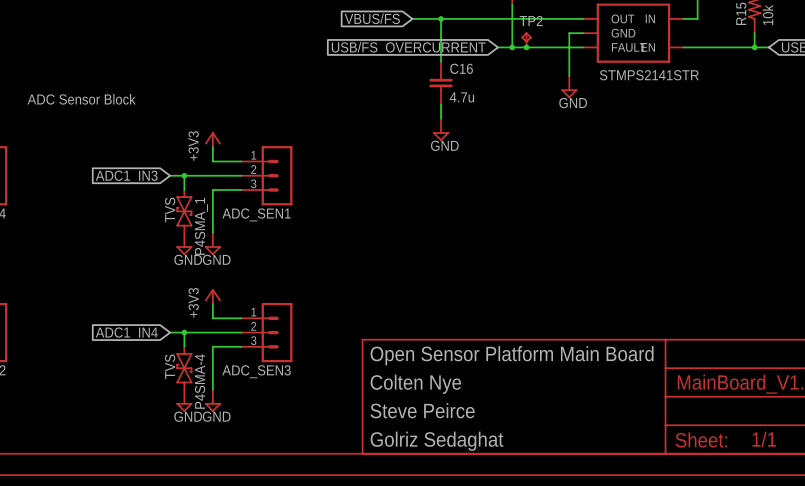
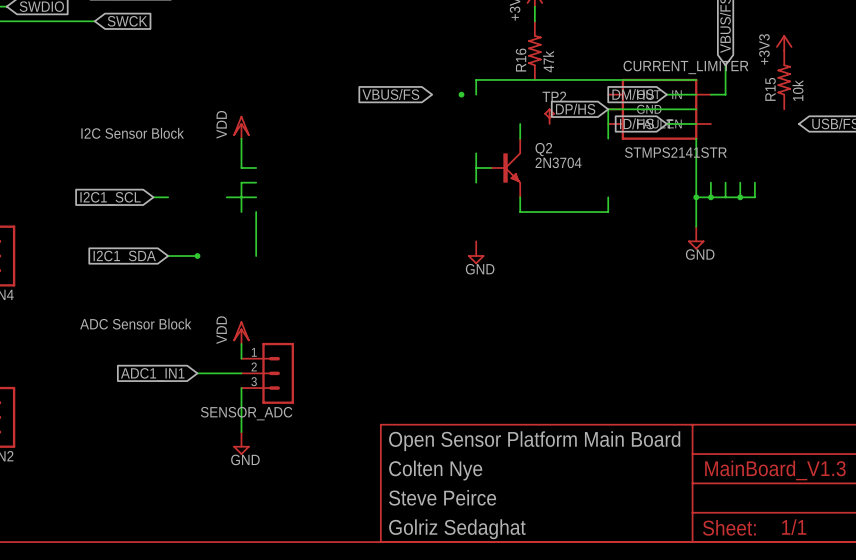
wire: (512, 4) (512, 47) -> none
wire: none -> (696, 79) (476, 79) (476, 94)
wire: (412, 18) (583, 18) -> none
wire: (441, 18) (441, 61) -> none
global label: none -> DM/HS (633, 94)
wire: none -> (666, 94) (696, 94)
global label: none -> DP/HS (575, 109)
wire: (583, 33) (569, 33) (569, 75) -> none
wire: none -> (696, 109) (608, 109) (608, 138)
wire: (754, 33) (754, 47) -> (740, 182) (740, 197)
wire: (498, 47) (583, 47) -> (520, 123) (520, 138)
junction: (512, 47) -> none
junction: (526, 47) -> none
global label: none -> ID/HS (636, 123)
wire: none -> (666, 123) (696, 123)
wire: (683, 47) (768, 47) -> none
junction: (754, 47) -> none
global label: USB/FS_OVERCURRENT (408, 48) -> none
power symbol: none -> VDD (241, 127)
text: none -> I2C Sensor Block (132, 133)
wire: none -> (241, 138) (241, 168) (256, 168)
wire: none -> (696, 138) (696, 226)
wire: none -> (476, 153) (476, 182)
C16: 4.7u (441, 83) -> none
power symbol: GND (569, 87) -> none
wire: none -> (476, 168) (490, 168)
Q2: none -> 2N3704 (505, 168)
text: ADC Sensor Block (81, 99) -> none
wire: none -> (256, 182) (241, 182) (241, 212)
wire: (441, 104) (441, 118) -> none
wire: none -> (710, 182) (710, 197)
wire: none -> (725, 182) (725, 197)
wire: none -> (754, 182) (754, 197) (696, 197)
wire: none -> (153, 197) (168, 197)
wire: none -> (226, 197) (256, 197)
wire: none -> (520, 197) (520, 212) (608, 212) (608, 197)
junction: none -> (696, 197)
junction: none -> (710, 197)
junction: none -> (740, 197)
global label: none -> I2C1_SCL (110, 198)
power symbol position: GND (441, 129) -> GND (476, 252)
power symbol: +3V3 (212, 139) -> none
wire: (212, 147) (212, 161) (241, 161) -> none
power symbol: none -> GND (696, 238)
wire: none -> (168, 256) (182, 256)
wire: (241, 175) (184, 175) (184, 190) -> (256, 256) (256, 212)
ADC_SEN1: (266, 175) -> none
global label: none -> I2C1_SDA (124, 257)
global label: ADC1_IN3 (126, 177) -> none
wire: (241, 190) (212, 190) (212, 232) -> none
P4SMA_1: TVS (184, 211) -> none
text: none -> ADC Sensor Block (135, 324)
power symbol: GND (184, 243) -> none
power symbol: GND (212, 243) -> none
power symbol: none -> VDD (241, 332)
wire: none -> (197, 373) (241, 373)
SENSOR_ADC: none -> (267, 373)
global label: none -> ADC1_IN1 (152, 374)
power symbol: +3V3 (212, 296) -> none
wire: (212, 304) (212, 318) (241, 318) -> none
wire: none -> (241, 388) (241, 432)
wire: (170, 332) (241, 332) -> none
wire: (184, 332) (184, 346) -> (241, 344) (241, 358)
junction: (184, 332) -> none
ADC_SEN3: (266, 332) -> none
global label: ADC1_IN4 (126, 333) -> none
wire: (241, 346) (212, 346) (212, 389) -> none
power symbol: none -> GND (241, 443)
P4SMA-4: TVS (184, 368) -> none
power symbol: GND (184, 400) -> none
power symbol: GND (212, 400) -> none

